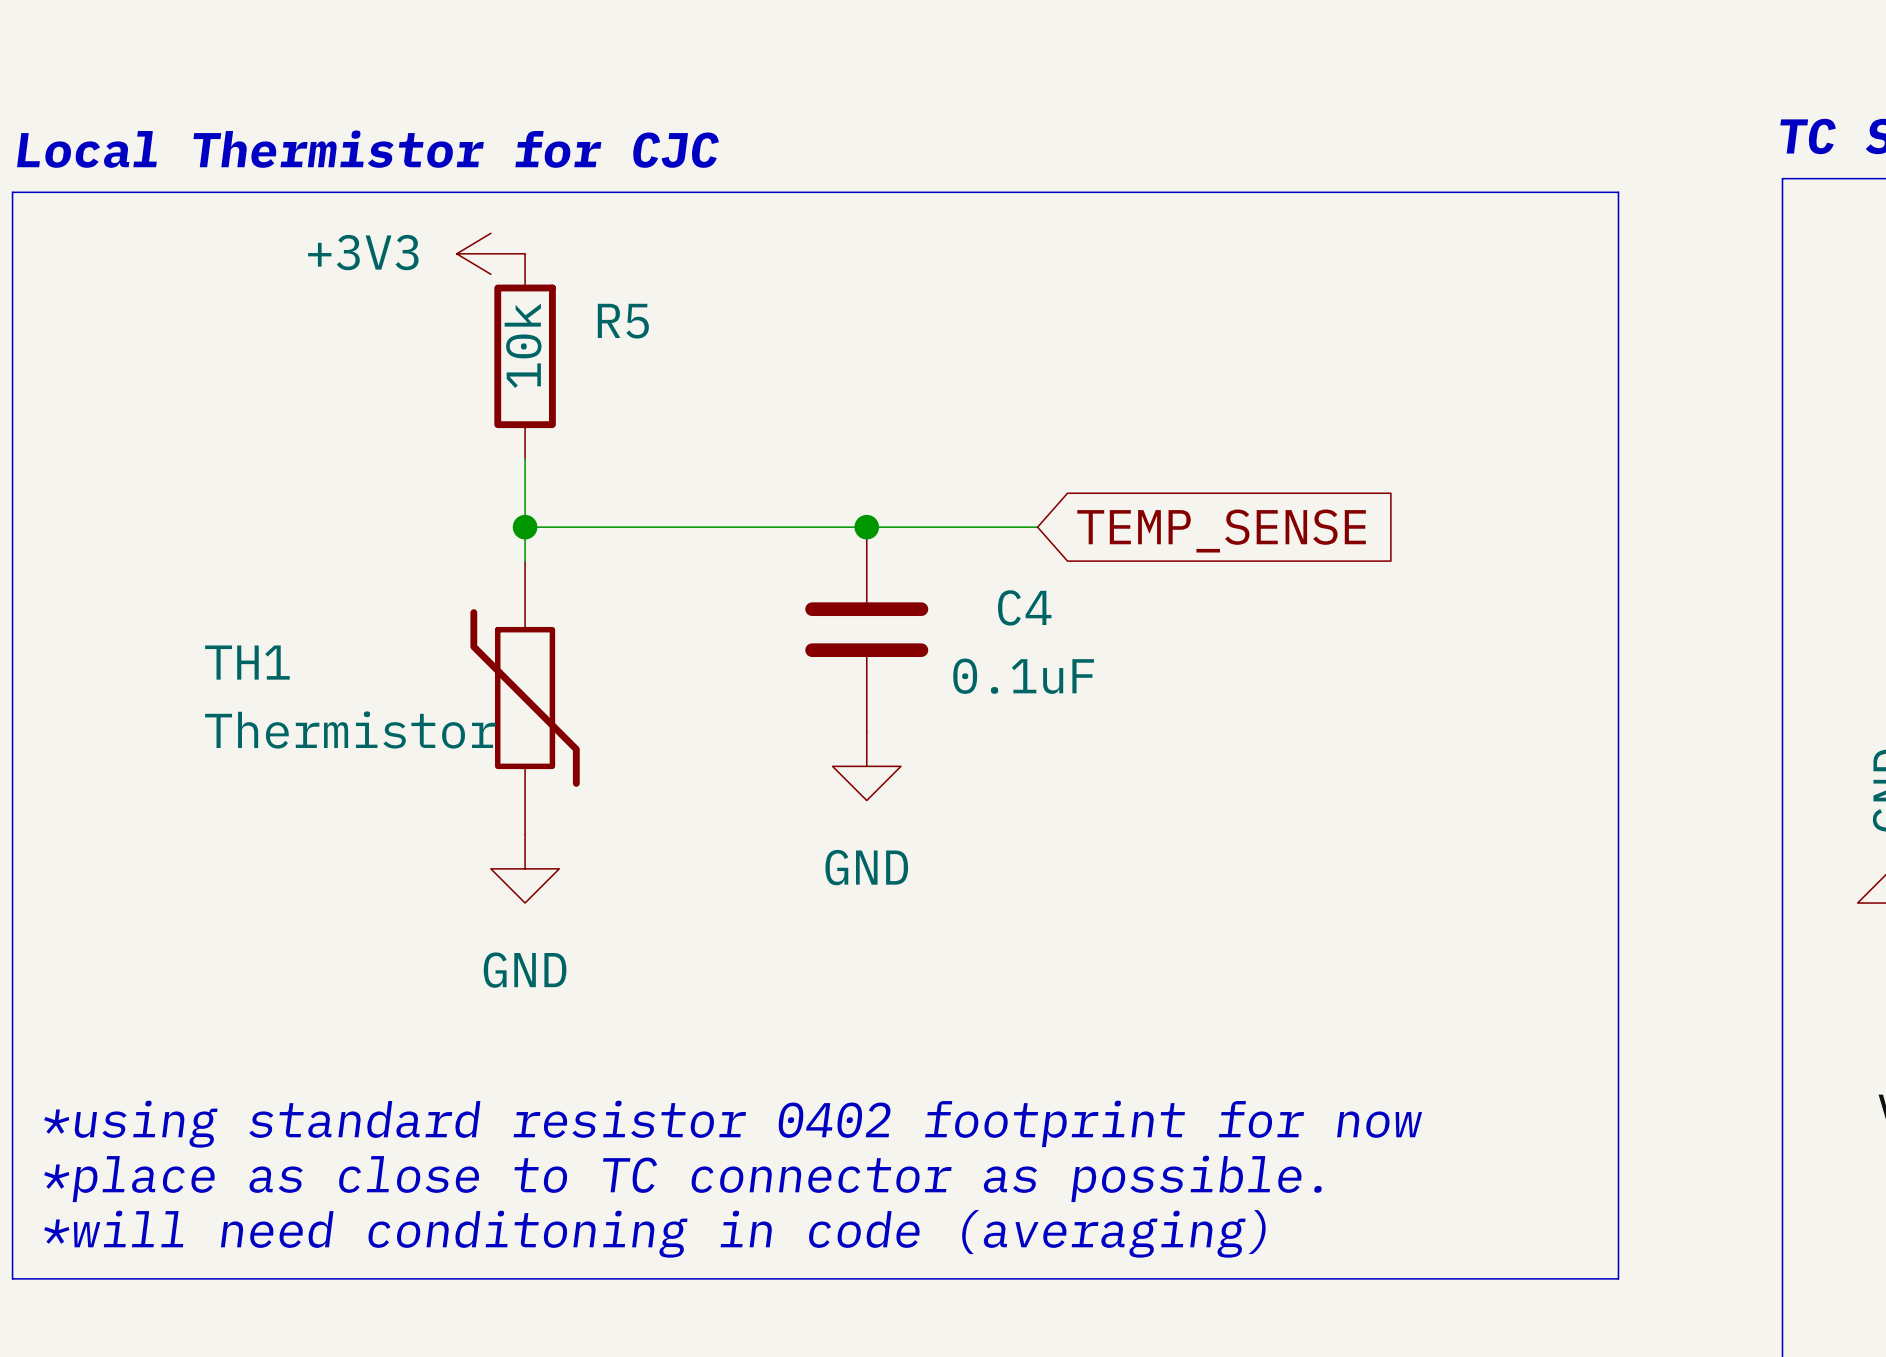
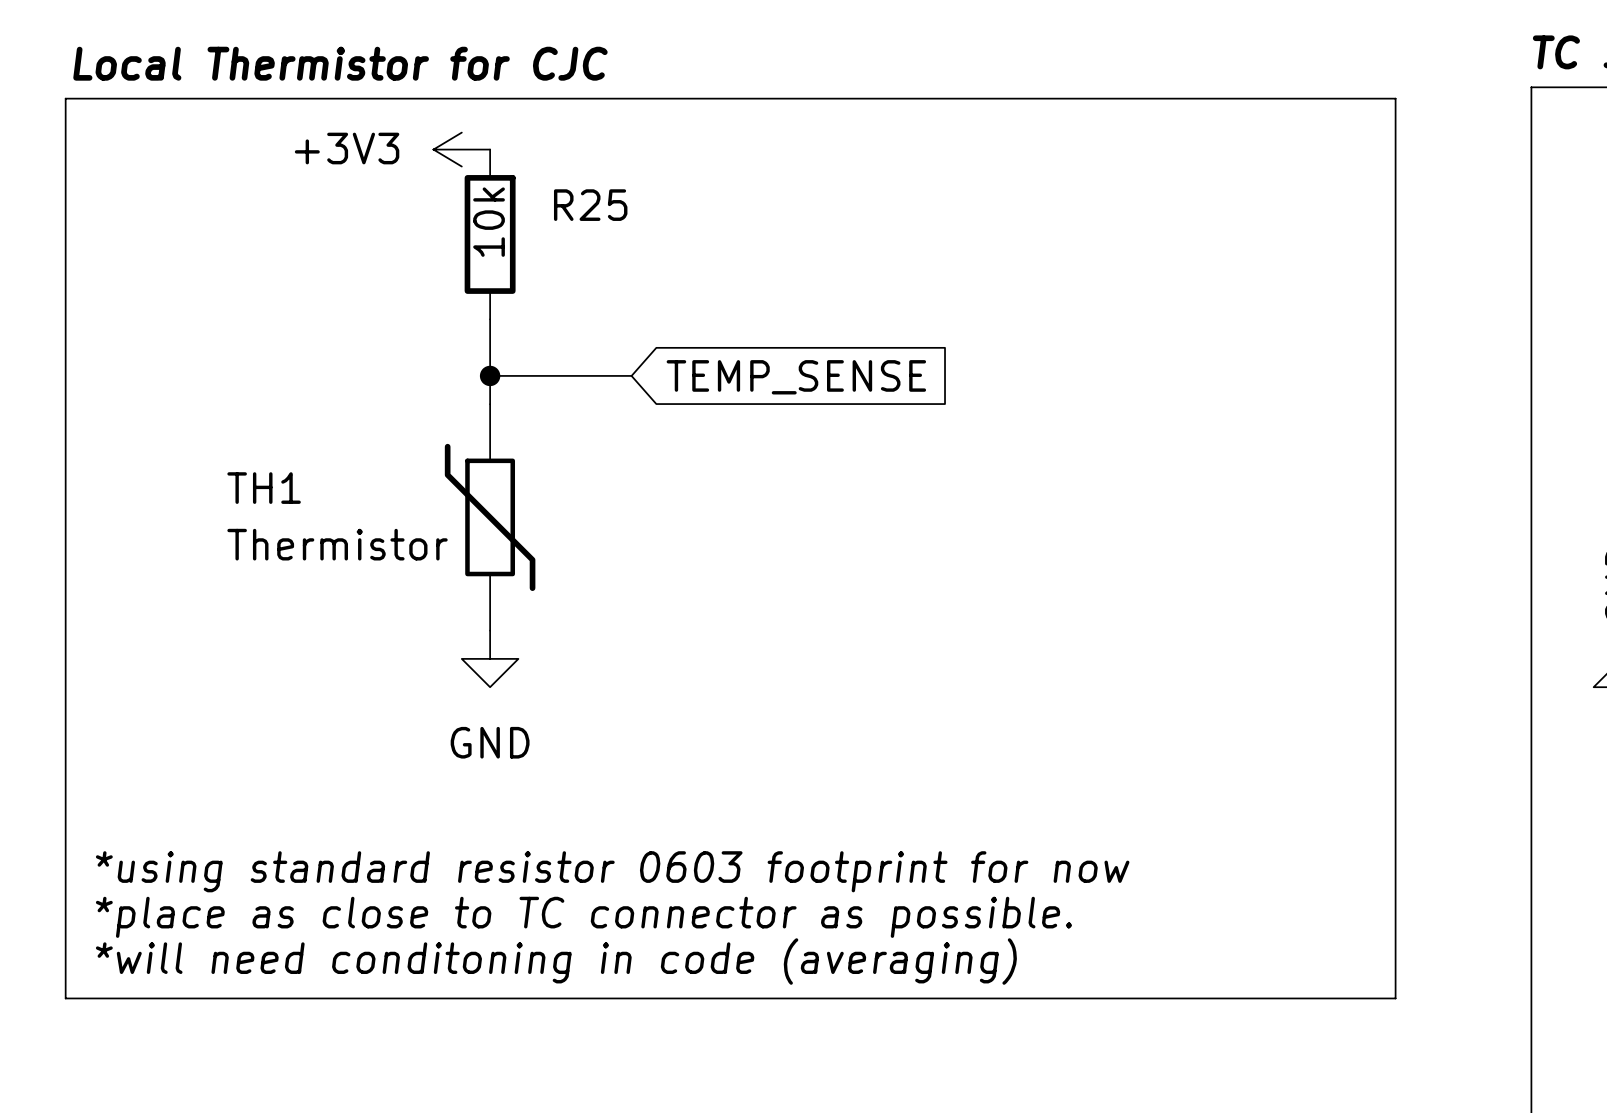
R5 name: R5 (623, 321) -> R25 (590, 205)
wire: (695, 527) (1037, 527) -> none
junction: (866, 527) -> none
global label position: TEMP_SENSE (1221, 531) -> TEMP_SENSE (796, 377)
C4: 0.1uF (866, 629) -> none
power symbol: GND (866, 766) -> none
text: *using standard resistor 0402 footprint for now (733, 1124) -> *using standard resistor 0603 footprint for now (612, 871)

